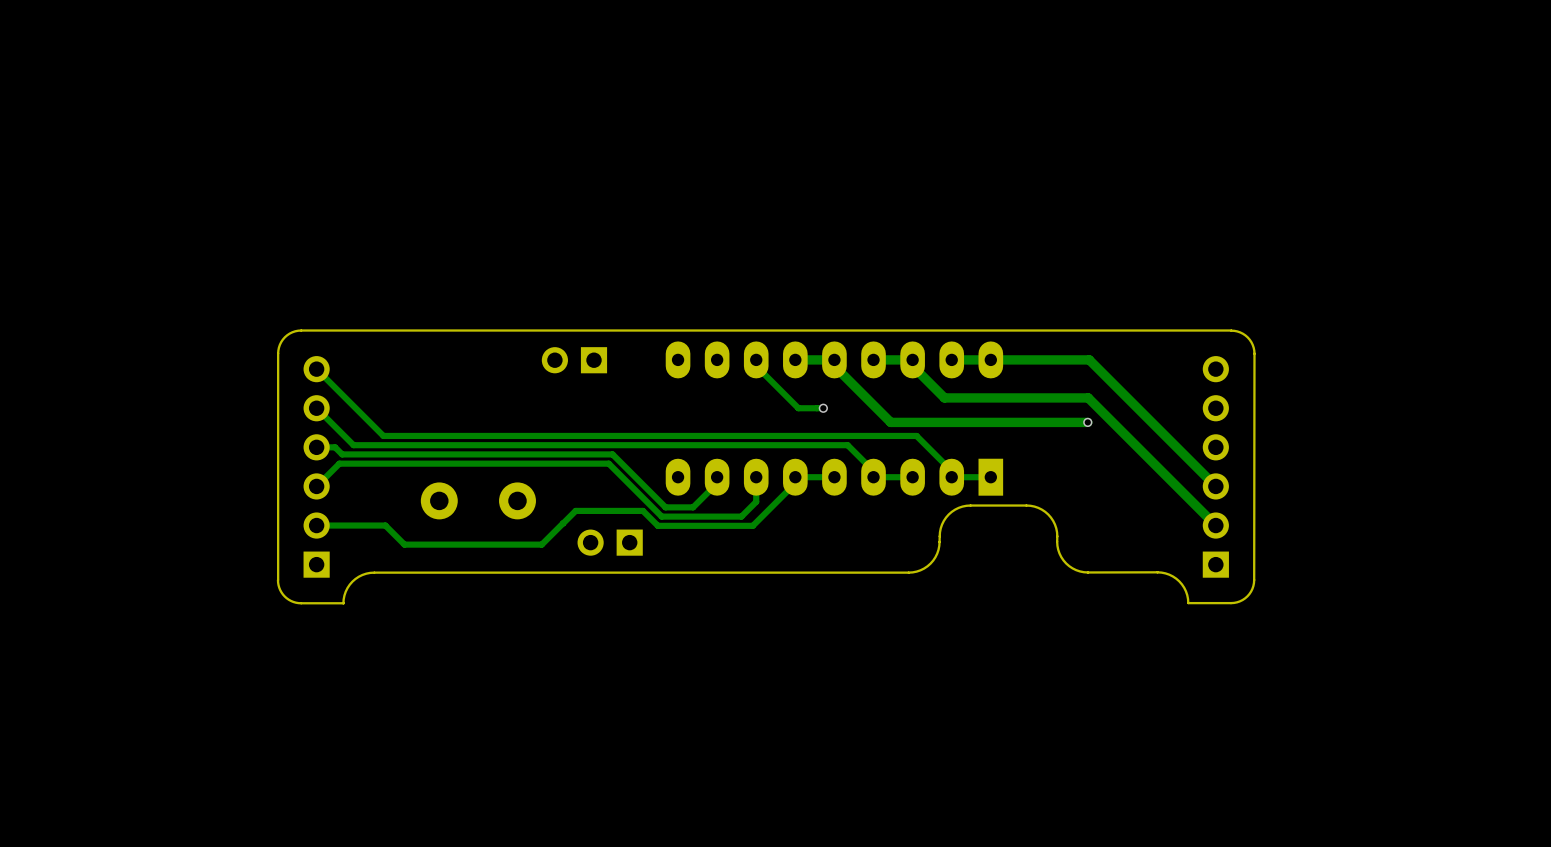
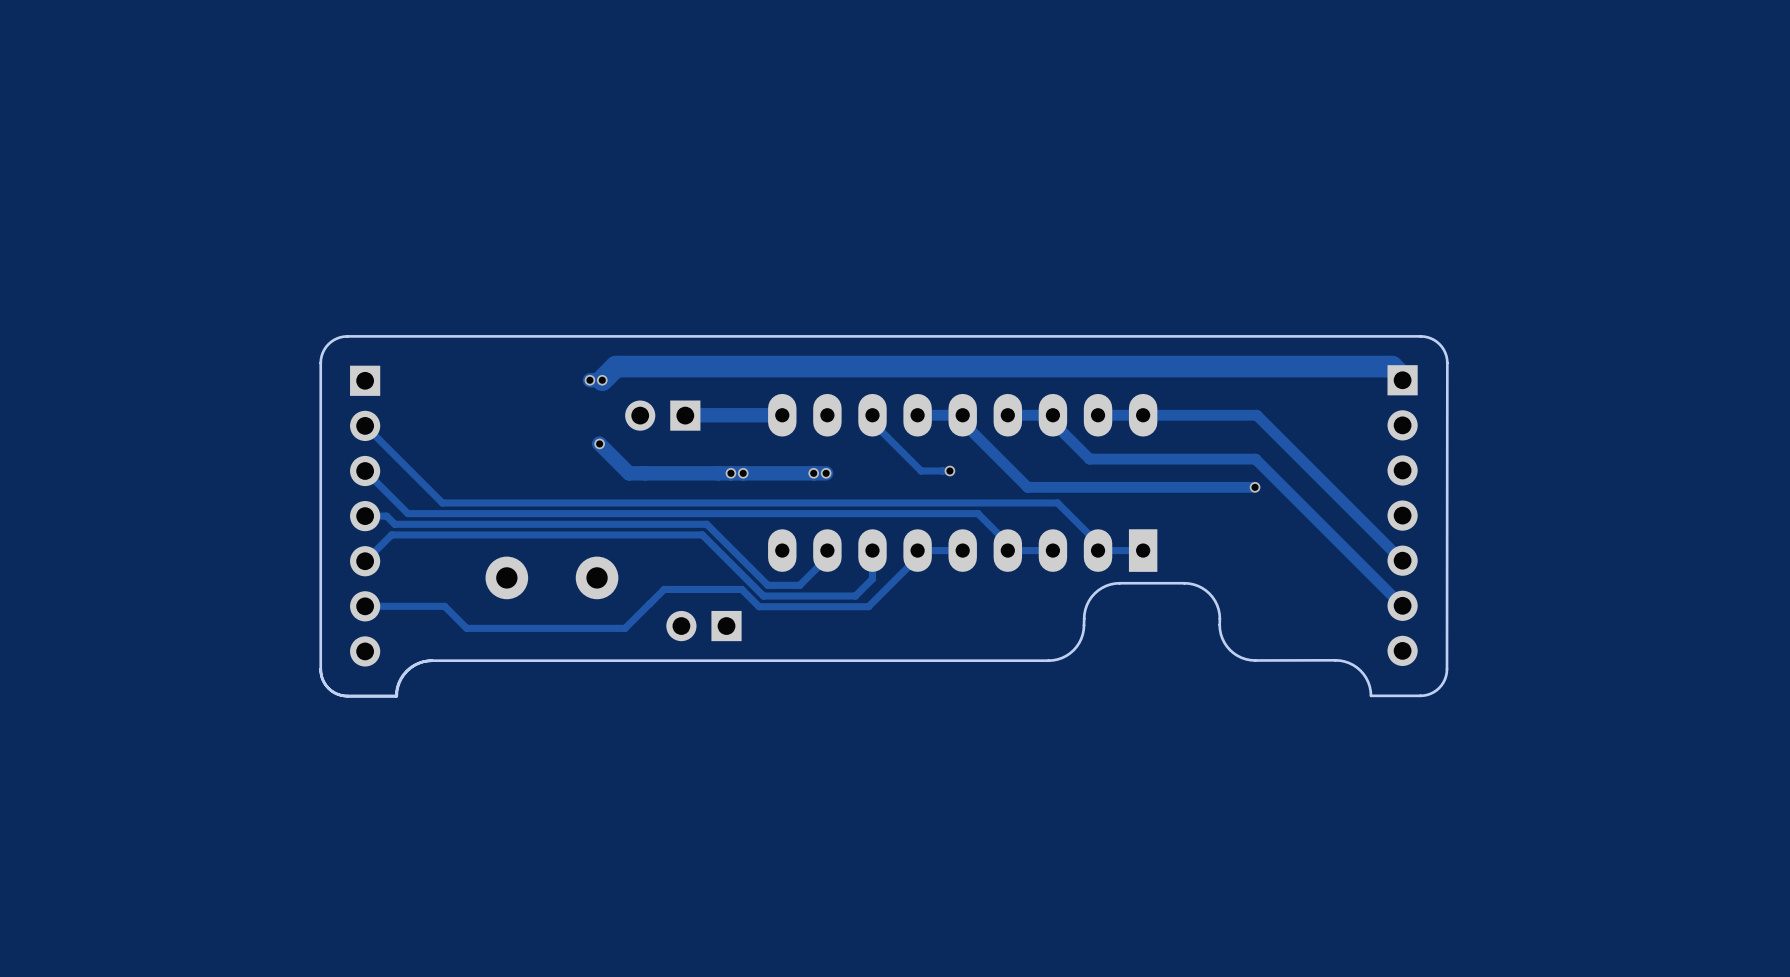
via: none -> (589, 380)
via: none -> (602, 380)
track: none -> (1402, 380) (1402, 377) (1392, 366) (615, 366) (602, 380) (589, 380)
board edge: (301, 330) (287, 335) (281, 342) (278, 350) (278, 580) -> none
board edge: (1231, 330) (301, 330) -> none
board edge: (1231, 330) (1240, 332) (1247, 337) (1252, 344) (1254, 353) -> none
board edge: (1254, 353) (1254, 580) -> (432, 660) (418, 663) (407, 671) (399, 682) (396, 696) (341, 695) (330, 690) (322, 678) (320, 363) (326, 346) (340, 337) (1427, 337) (1441, 346) (1447, 363) (1446, 669)
track: none -> (782, 415) (685, 415)
track: none -> (599, 443) (629, 473) (826, 473)
via: none -> (599, 443)
via: none -> (730, 473)
via: none -> (743, 473)
via: none -> (813, 473)
via: none -> (826, 473)
part: none -> (1402, 515)
part: none -> (365, 516)
part: (316, 466) -> none
part: (1215, 466) -> none

